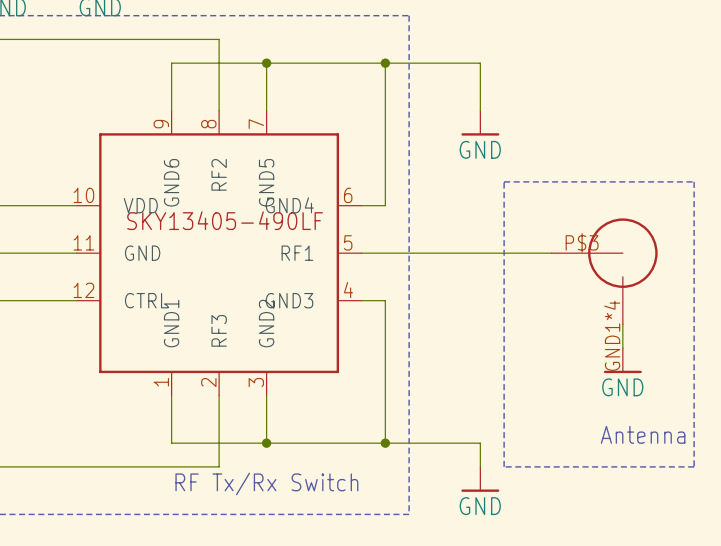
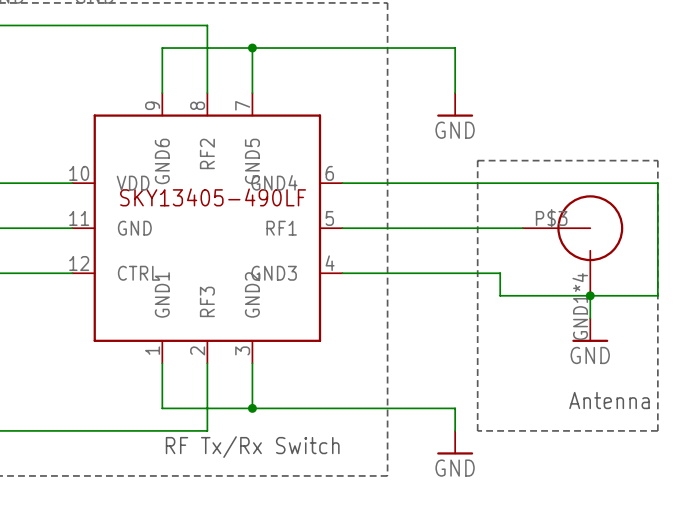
wire: (385, 63) (385, 205) -> (365, 273) (500, 273) (500, 295) (657, 295) (657, 183) (365, 183)
junction: (385, 63) -> none
wire: (385, 300) (385, 443) -> none
junction: none -> (590, 295)
junction: (385, 443) -> none

